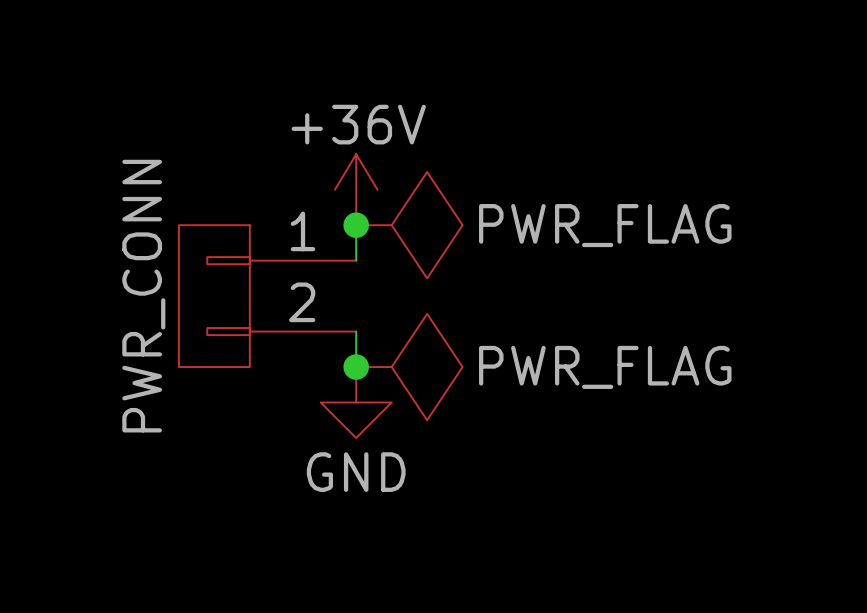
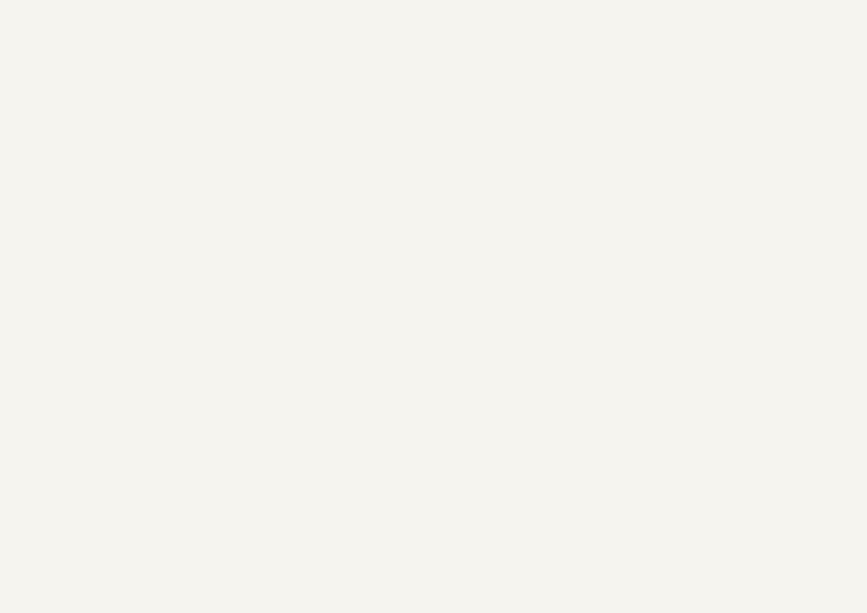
power symbol: +36V (356, 189) -> none
wire: (356, 225) (356, 260) -> none
junction: (356, 225) -> none
power symbol: PWR_FLAG (409, 225) -> none
part: PWR_CONN (267, 296) -> none
wire: (356, 331) (356, 367) -> none
junction: (356, 367) -> none
power symbol: PWR_FLAG (409, 367) -> none
power symbol: GND (356, 402) -> none

